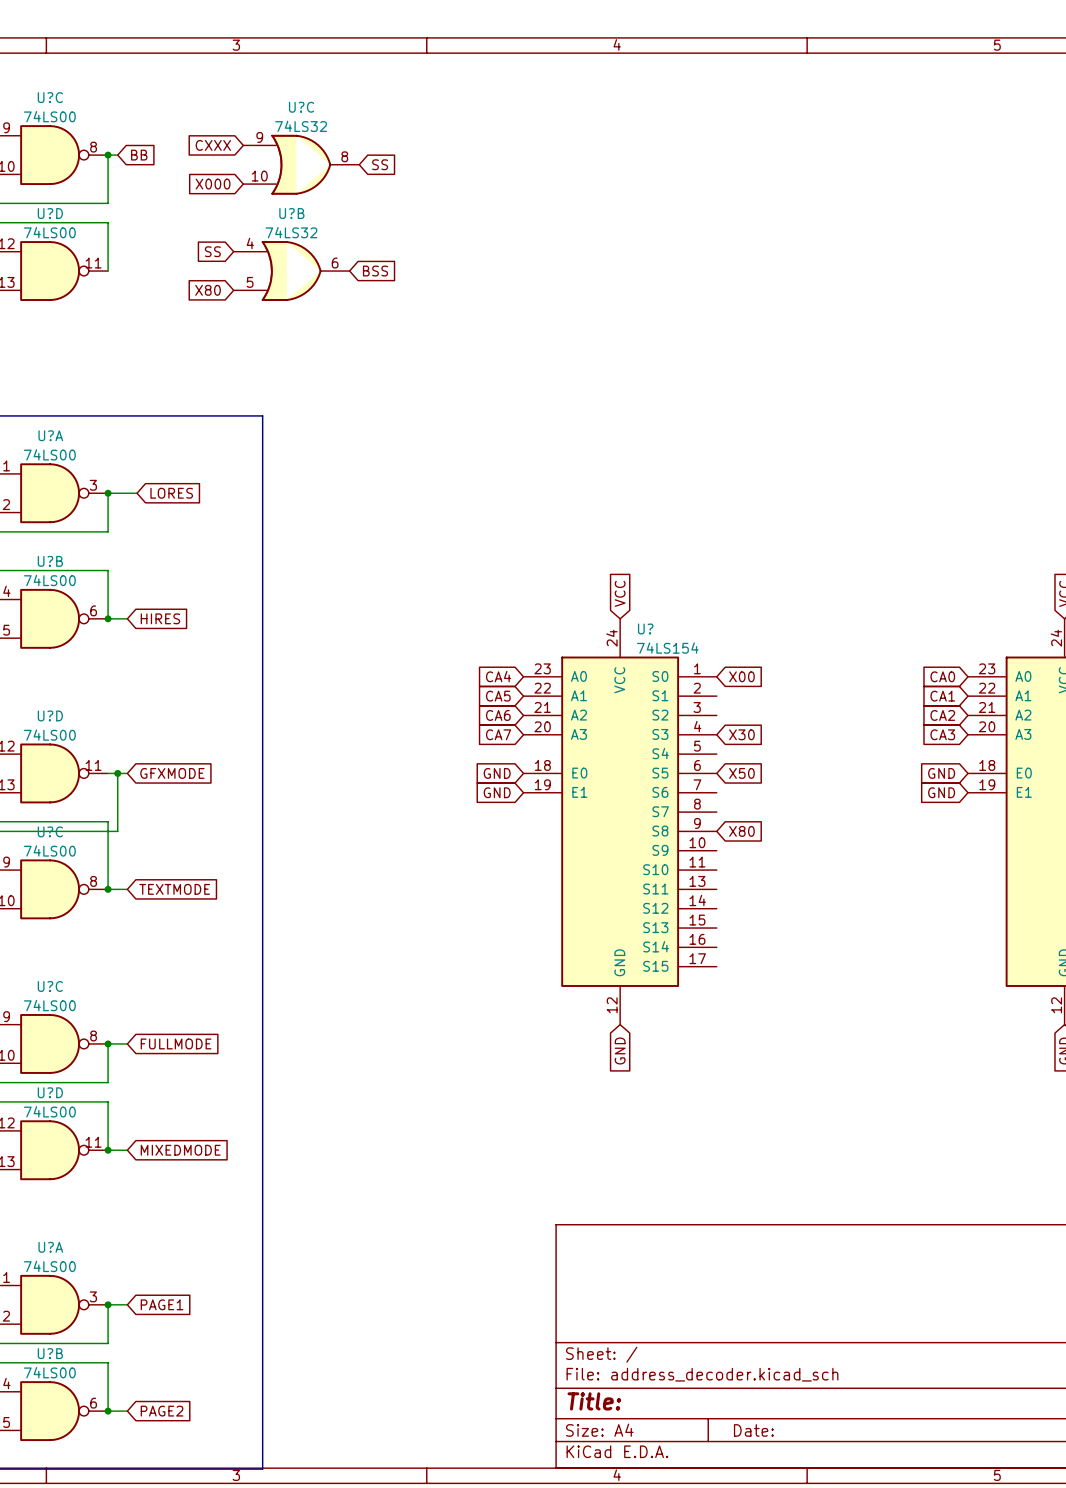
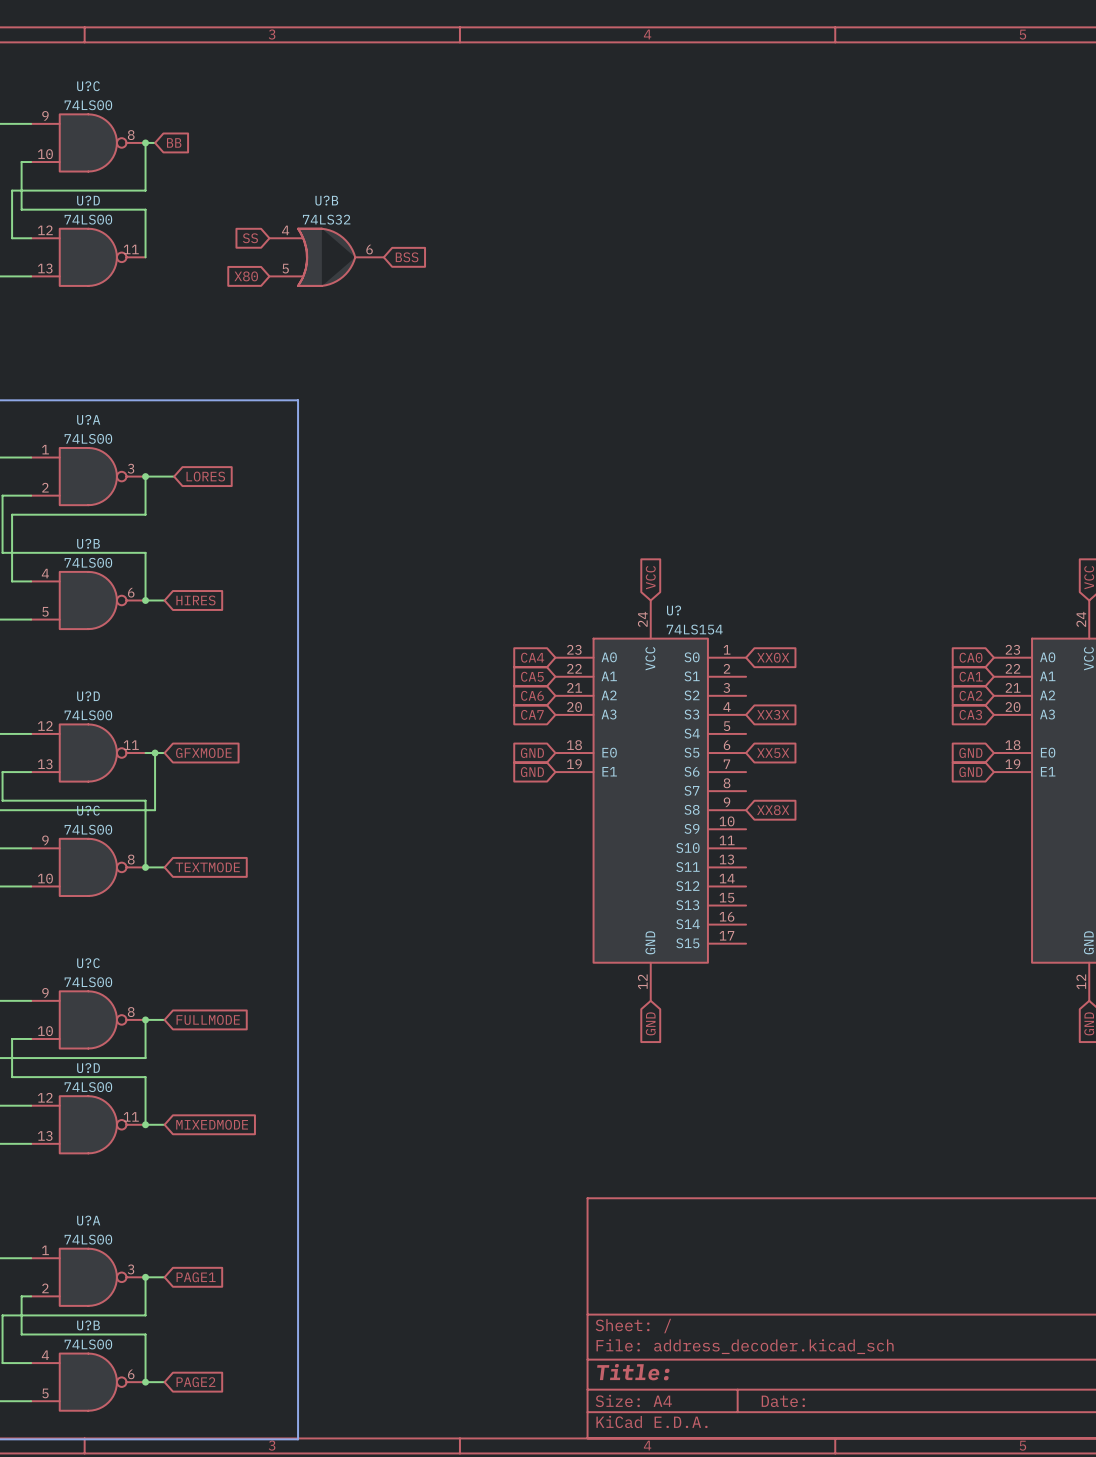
global label: CXXX (213, 145) -> none
U?C: 74LS32 (301, 164) -> none
global label: SS (380, 164) -> none
global label: X000 (213, 184) -> none
global label: X00 (741, 676) -> XX0X (773, 657)
global label: X30 (741, 734) -> XX3X (773, 714)
global label: X50 (741, 773) -> XX5X (773, 753)
global label: X80 (741, 831) -> XX8X (773, 810)

